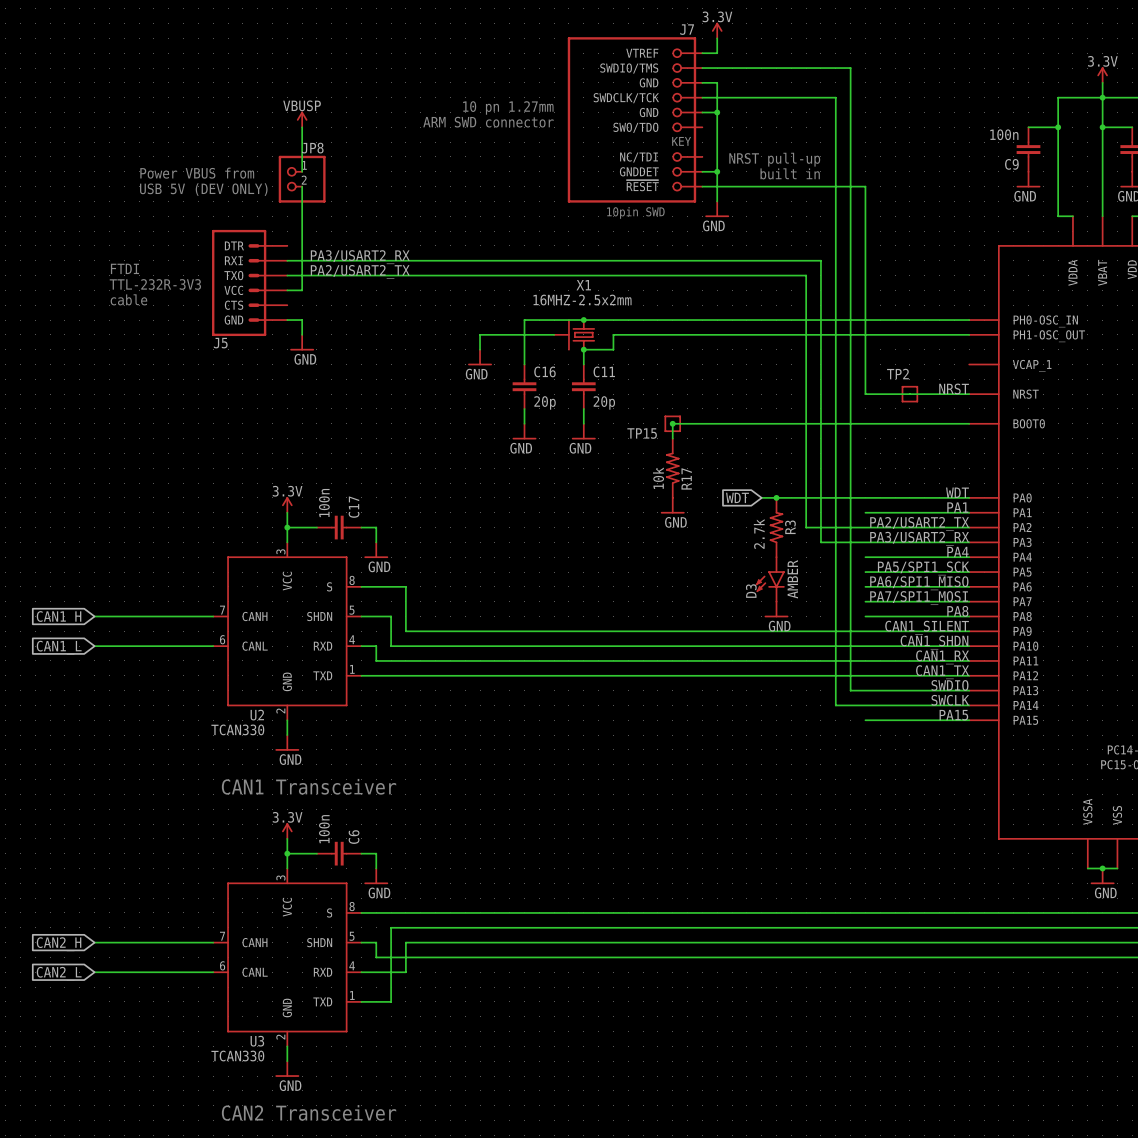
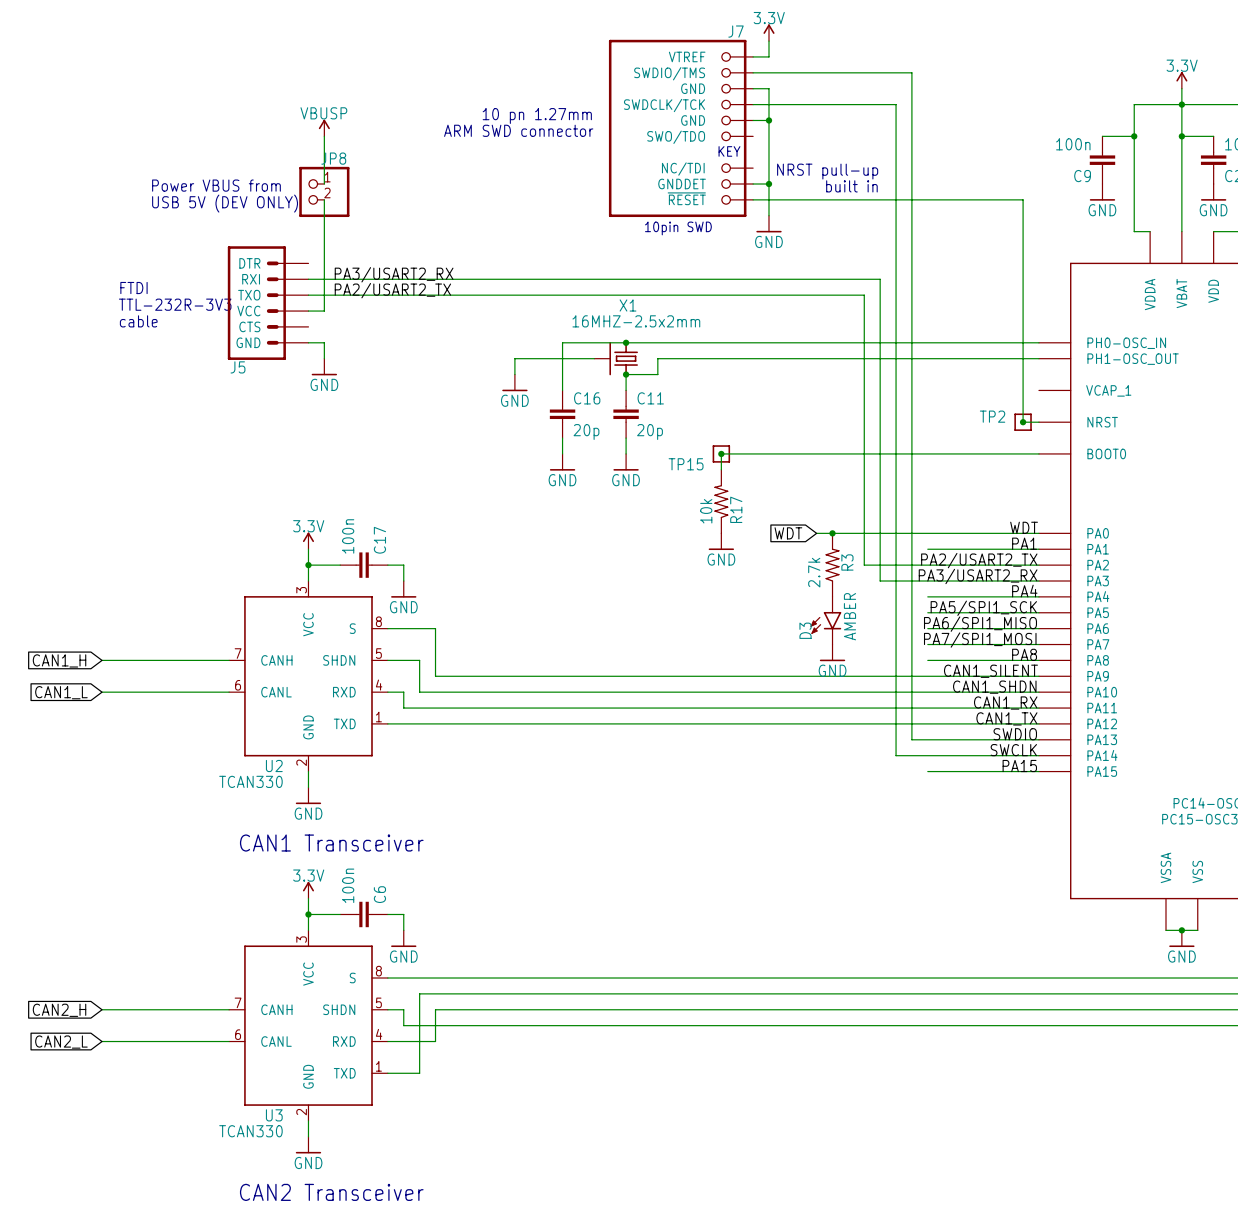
wire: (865, 186) (865, 394) (954, 394) -> (927, 199) (1023, 199) (1023, 422)
TP2 name position: TP2 (897, 374) -> TP2 (992, 416)
label: NRST (954, 388) -> none
TP2 position: (909, 394) -> (1023, 422)
junction: none -> (1023, 422)

